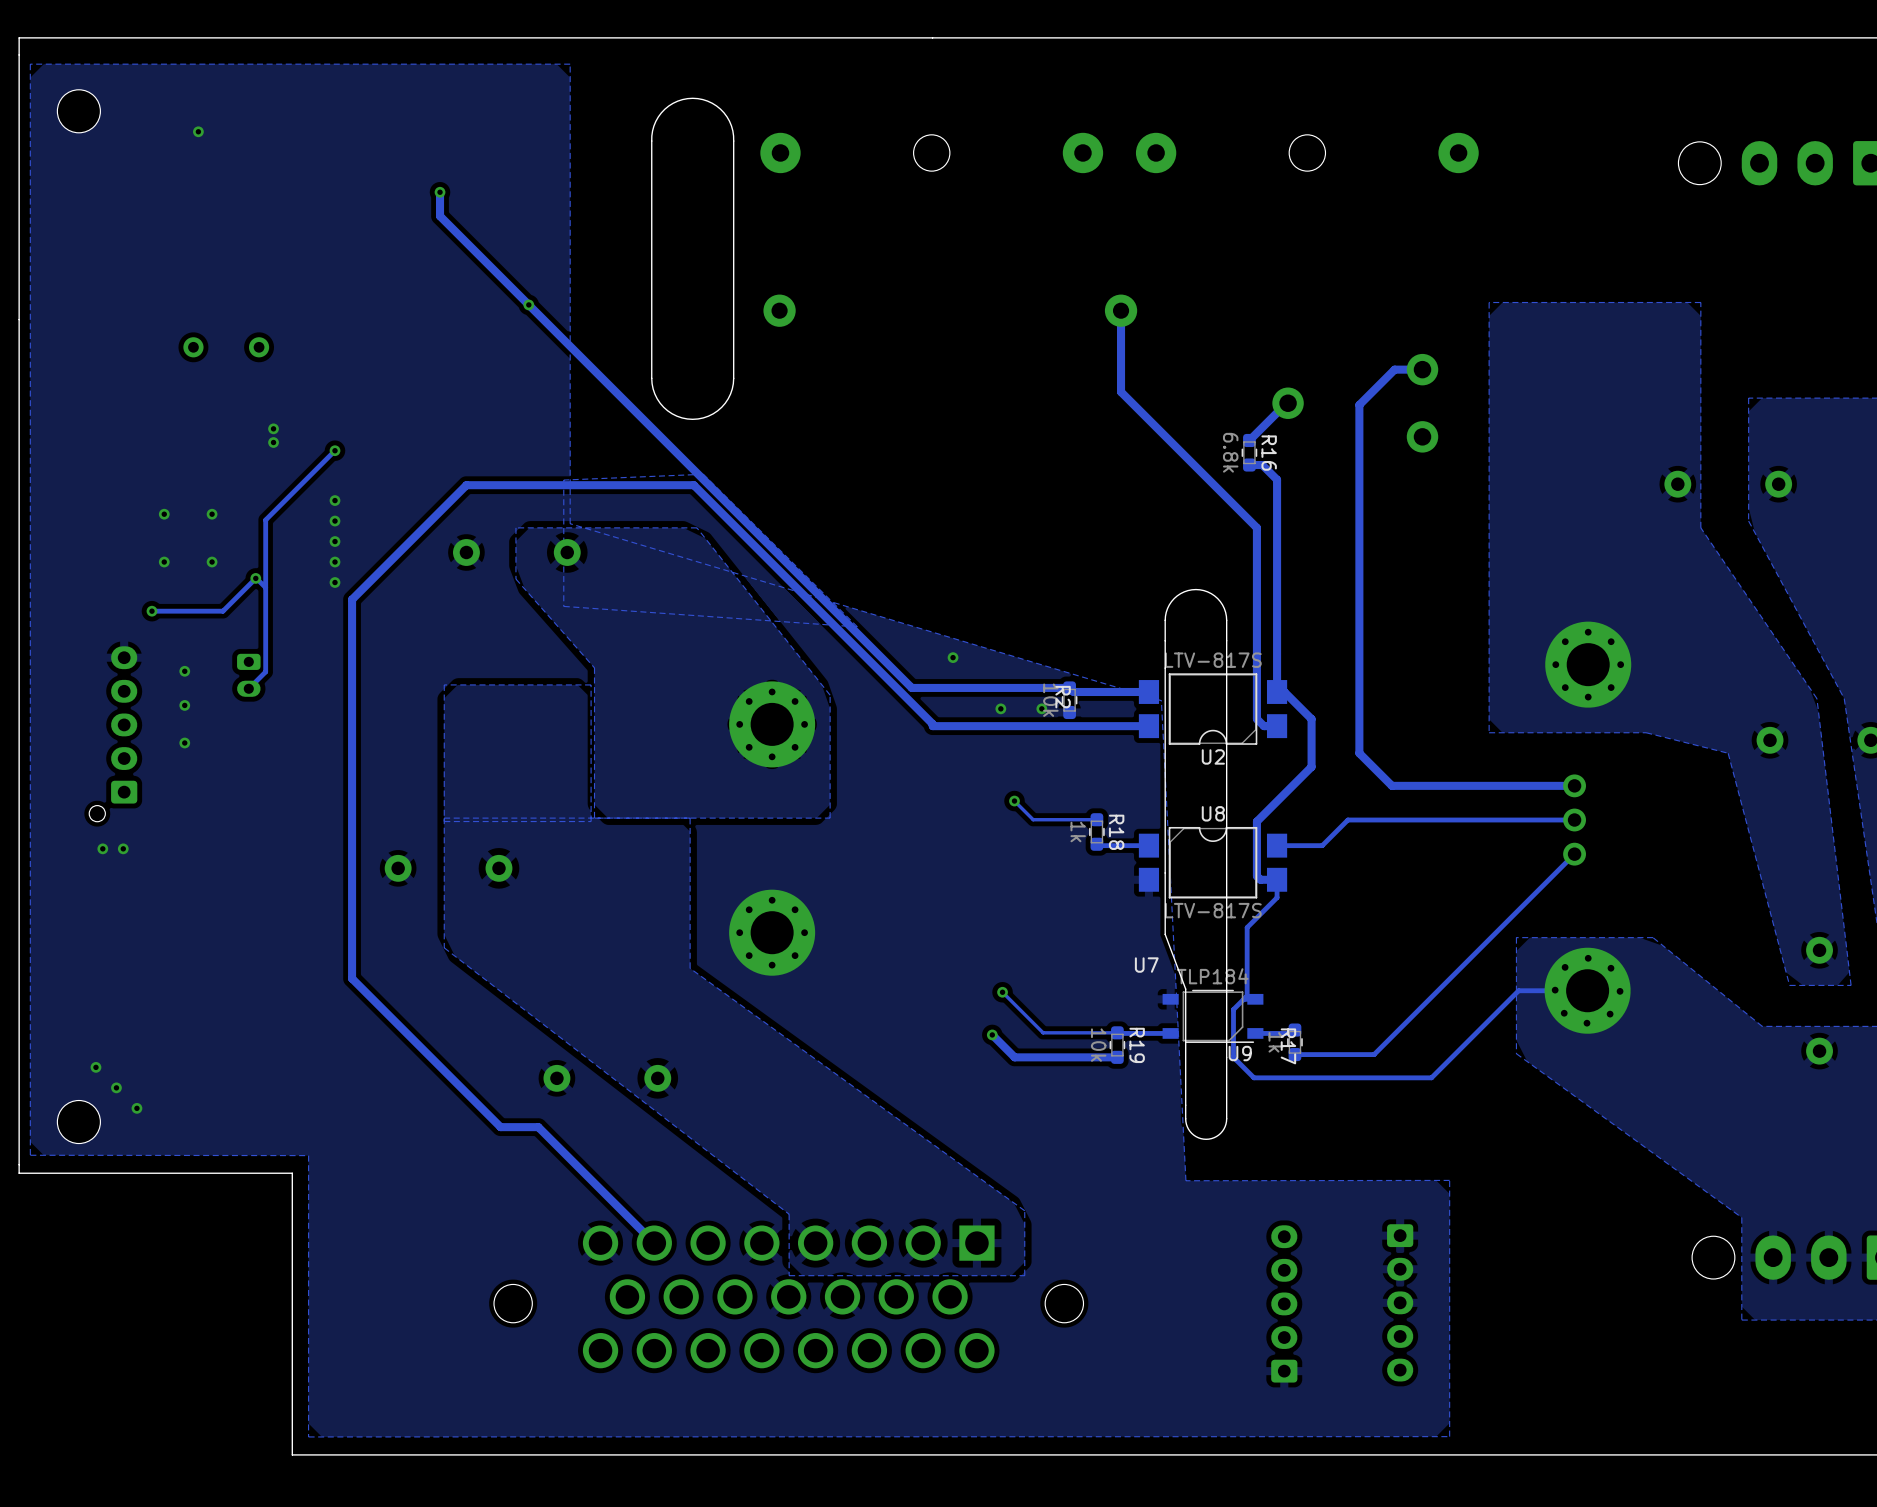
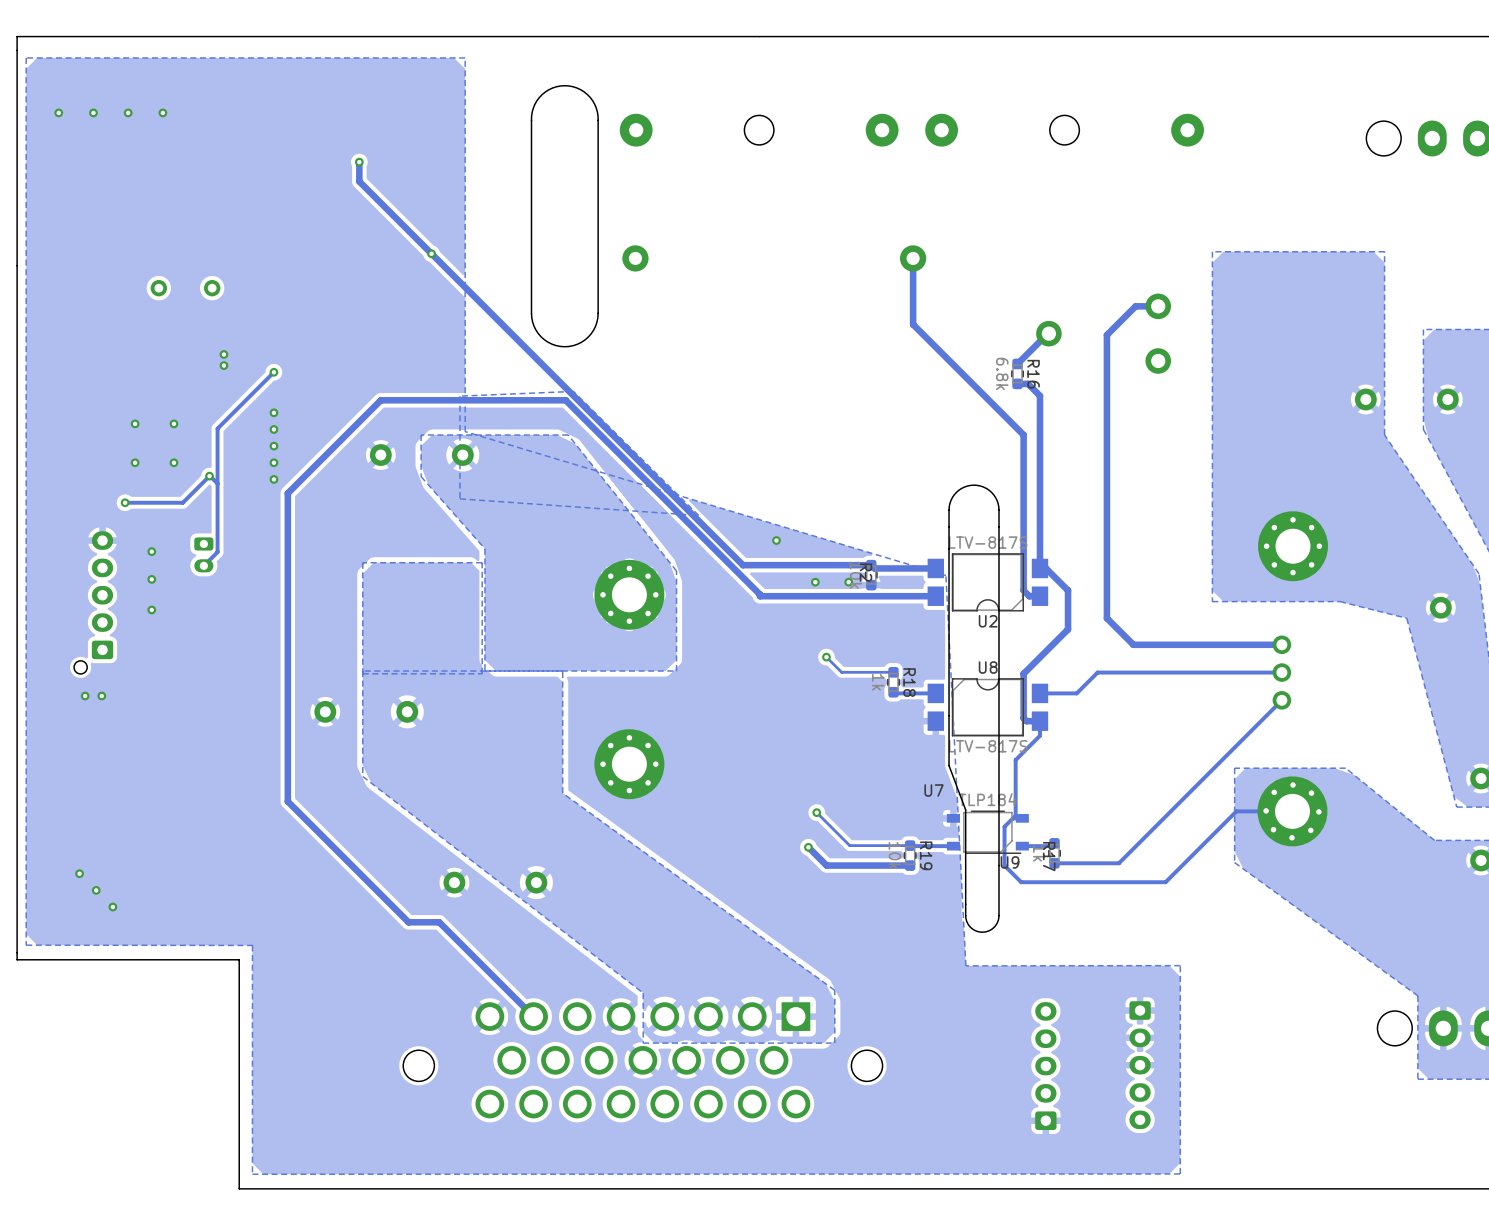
part: (78, 111) -> none
via: none -> (58, 112)
via: none -> (93, 112)
via: none -> (128, 112)
part: (78, 1122) -> none

